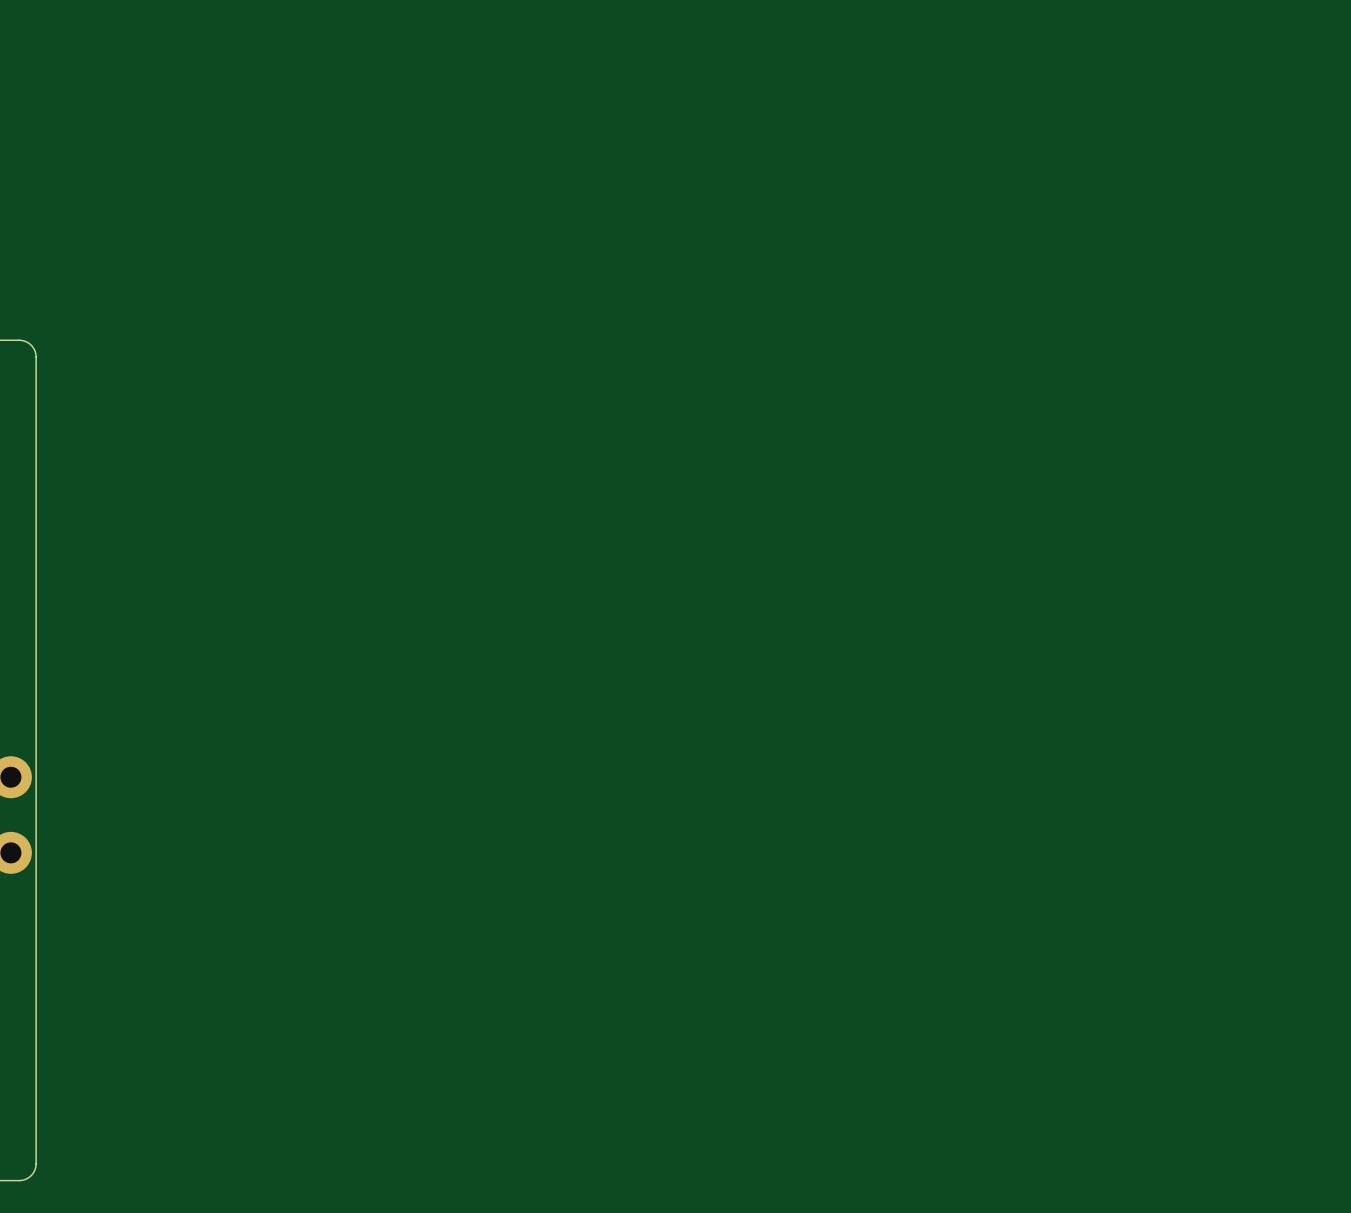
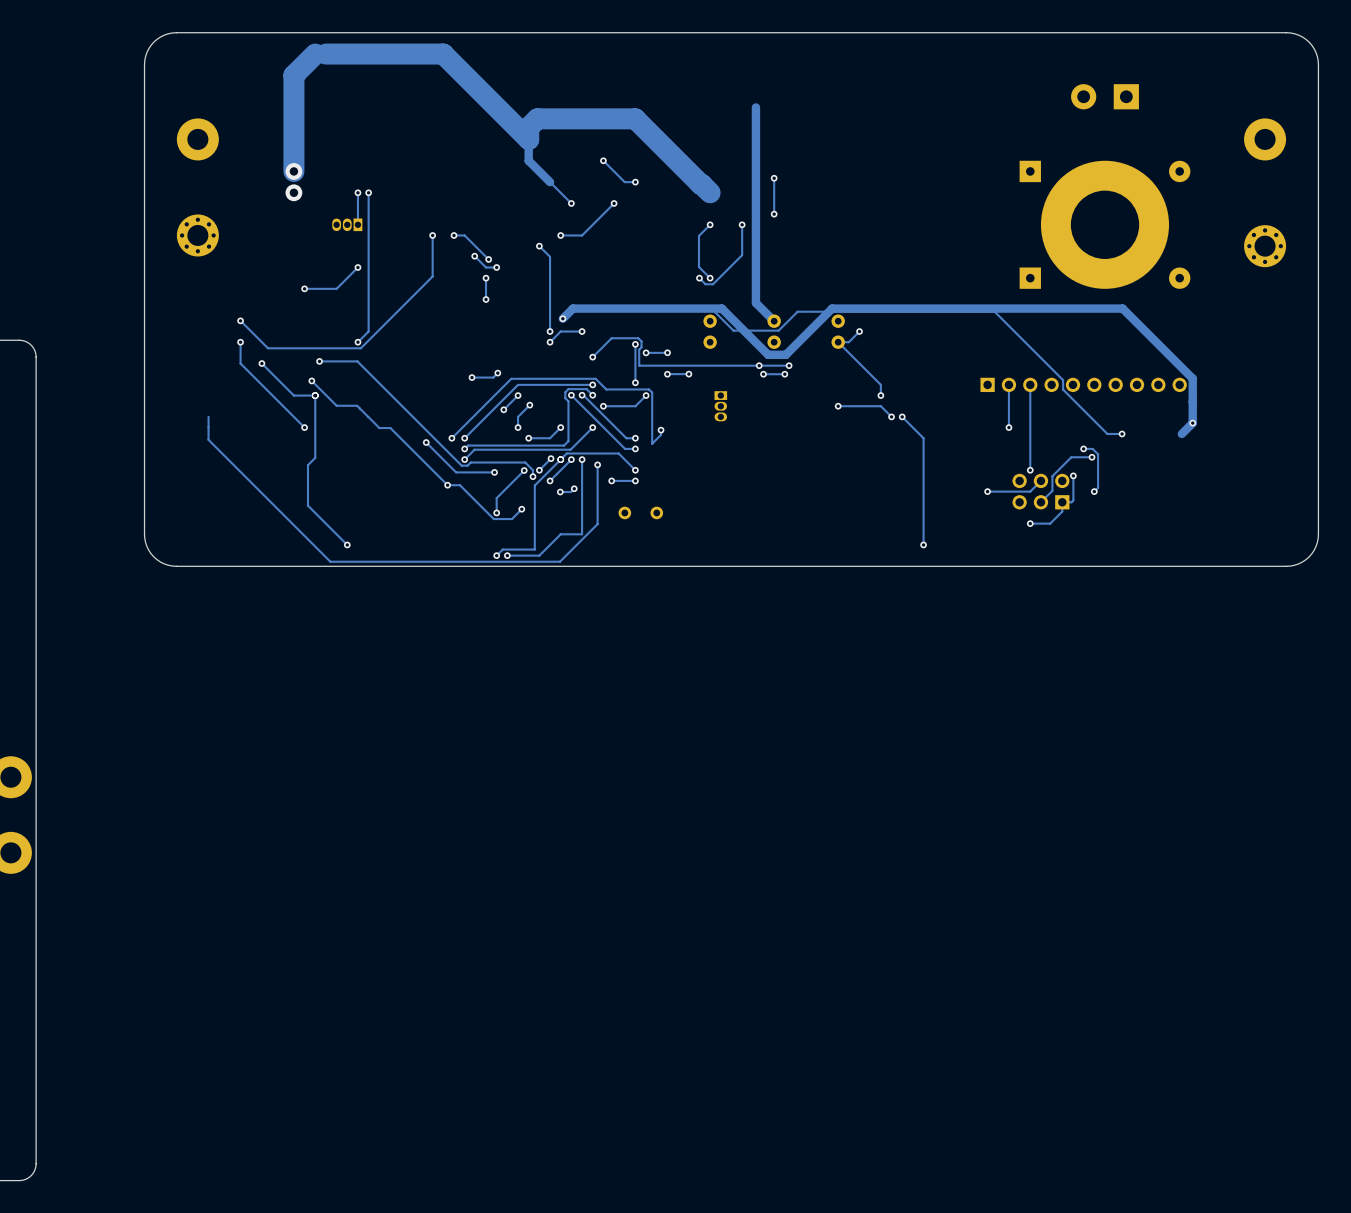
board edge: none -> (1286, 32) (176, 32) (164, 35) (153, 42) (148, 48) (144, 64) (144, 534) (146, 546) (153, 556) (160, 562) (176, 566) (1286, 566) (1298, 563) (1309, 556) (1314, 550) (1318, 534) (1318, 64) (1316, 52) (1309, 42) (1298, 35) (1286, 32)
part: none -> (1105, 96)
track: none -> (755, 107) (755, 302) (774, 321)
part: none -> (197, 139)
track: none -> (528, 139) (528, 160) (571, 203)
track: none -> (528, 139) (443, 54) (315, 54) (293, 75) (293, 171)
track: none -> (528, 139) (528, 127) (537, 118) (635, 118) (710, 192)
part: none -> (1265, 139)
track: none -> (603, 160) (624, 182) (635, 182)
via: none -> (603, 160)
via: none -> (293, 171)
track: none -> (774, 178) (774, 214)
via: none -> (774, 178)
via: none -> (635, 182)
via: none -> (293, 192)
track: none -> (357, 192) (357, 224)
via: none -> (357, 192)
track: none -> (368, 192) (368, 331) (357, 342)
via: none -> (368, 192)
via: none -> (571, 203)
track: none -> (614, 203) (582, 235) (560, 235)
via: none -> (614, 203)
via: none -> (774, 214)
part: none -> (347, 224)
track: none -> (710, 224) (699, 235) (699, 267) (710, 278)
via: none -> (710, 224)
track: none -> (742, 224) (742, 255) (713, 284) (705, 284) (699, 278)
via: none -> (742, 224)
part: none -> (1105, 224)
part: none -> (197, 235)
track: none -> (432, 235) (432, 276) (360, 348) (268, 348) (240, 320)
via: none -> (432, 235)
track: none -> (454, 235) (464, 235) (488, 259)
via: none -> (454, 235)
via: none -> (560, 235)
track: none -> (539, 246) (550, 256) (550, 331)
via: none -> (539, 246)
part: none -> (1265, 246)
track: none -> (474, 256) (486, 267) (496, 267)
via: none -> (474, 256)
via: none -> (488, 259)
track: none -> (357, 267) (336, 288) (304, 288)
via: none -> (357, 267)
via: none -> (496, 267)
track: none -> (486, 278) (486, 299)
via: none -> (486, 278)
via: none -> (699, 278)
via: none -> (710, 278)
via: none -> (304, 288)
via: none -> (486, 299)
track: none -> (714, 311) (733, 330) (778, 330) (797, 311) (994, 311) (1063, 380) (1063, 389) (1107, 433) (1122, 433)
track: none -> (562, 318) (572, 308) (721, 308) (768, 354) (785, 354) (832, 308) (1122, 308) (1192, 378) (1192, 423) (1181, 433)
via: none -> (562, 318)
via: none -> (240, 320)
via: none -> (550, 331)
track: none -> (582, 331) (560, 331) (550, 342)
via: none -> (582, 331)
part: none -> (710, 331)
part: none -> (774, 331)
part: none -> (838, 331)
track: none -> (859, 331) (848, 342) (838, 342) (880, 384) (880, 395)
via: none -> (859, 331)
track: none -> (240, 342) (240, 363) (304, 427)
via: none -> (240, 342)
via: none -> (357, 342)
via: none -> (550, 342)
track: none -> (635, 344) (635, 382)
via: none -> (635, 344)
via: none -> (646, 352)
track: none -> (667, 352) (646, 352)
via: none -> (667, 352)
track: none -> (592, 357) (611, 338) (638, 338) (641, 341) (641, 347) (639, 349) (639, 365) (789, 365)
via: none -> (592, 357)
track: none -> (319, 361) (357, 361) (461, 465) (467, 465) (470, 462) (525, 462) (532, 470) (532, 476)
via: none -> (319, 361)
track: none -> (261, 363) (293, 395) (315, 395) (315, 457) (308, 465) (308, 505) (347, 544)
via: none -> (261, 363)
via: none -> (759, 365)
via: none -> (789, 365)
track: none -> (497, 373) (493, 377) (472, 377)
via: none -> (497, 373)
via: none -> (667, 374)
track: none -> (688, 374) (667, 374)
via: none -> (688, 374)
via: none -> (763, 374)
track: none -> (784, 374) (763, 374)
via: none -> (784, 374)
via: none -> (472, 377)
track: none -> (311, 380) (336, 405) (357, 405) (379, 428) (390, 428) (447, 485) (459, 485) (493, 519) (511, 519) (521, 509)
via: none -> (311, 380)
via: none -> (635, 382)
track: none -> (592, 384) (518, 384) (464, 438)
via: none -> (592, 384)
track: none -> (1008, 384) (1008, 427)
track: none -> (1030, 384) (1030, 470)
part: none -> (1083, 384)
via: none -> (315, 395)
track: none -> (518, 395) (503, 409)
via: none -> (518, 395)
track: none -> (571, 395) (625, 448) (635, 448)
via: none -> (571, 395)
track: none -> (582, 395) (626, 438) (635, 438)
via: none -> (582, 395)
track: none -> (592, 395) (586, 389) (568, 389) (565, 392) (565, 398) (568, 401) (568, 441) (564, 445) (468, 445) (464, 448)
via: none -> (592, 395)
track: none -> (646, 395) (635, 406) (603, 406)
via: none -> (646, 395)
via: none -> (880, 395)
track: none -> (529, 405) (518, 416) (518, 427)
via: none -> (529, 405)
via: none -> (603, 406)
part: none -> (720, 406)
track: none -> (838, 406) (880, 406) (891, 416)
via: none -> (838, 406)
via: none -> (503, 409)
track: none -> (208, 416) (208, 439) (330, 561) (559, 561) (597, 524) (597, 464)
via: none -> (891, 416)
track: none -> (902, 416) (923, 438) (923, 544)
via: none -> (902, 416)
via: none -> (1192, 423)
via: none -> (304, 427)
via: none -> (518, 427)
track: none -> (560, 427) (550, 438) (528, 438)
via: none -> (560, 427)
track: none -> (592, 427) (570, 449) (474, 449) (464, 459)
via: none -> (592, 427)
via: none -> (1008, 427)
track: none -> (661, 430) (661, 434) (652, 443) (652, 392) (649, 389) (606, 389) (595, 378) (511, 378) (451, 438)
via: none -> (661, 430)
via: none -> (1122, 433)
via: none -> (451, 438)
via: none -> (464, 438)
via: none -> (528, 438)
via: none -> (635, 438)
track: none -> (426, 442) (456, 472) (494, 472)
via: none -> (426, 442)
via: none -> (464, 448)
via: none -> (635, 448)
track: none -> (1083, 448) (1092, 448) (1098, 454) (1098, 487) (1094, 491)
via: none -> (1083, 448)
track: none -> (1091, 457) (1071, 457) (1052, 476) (1052, 490) (1040, 502)
via: none -> (1091, 457)
track: none -> (551, 458) (539, 470)
via: none -> (551, 458)
via: none -> (464, 459)
via: none -> (560, 459)
track: none -> (571, 459) (550, 480)
via: none -> (571, 459)
track: none -> (582, 459) (582, 534) (560, 534) (539, 555) (507, 555)
via: none -> (582, 459)
via: none -> (597, 464)
track: none -> (524, 470) (496, 498) (496, 512)
via: none -> (524, 470)
via: none -> (539, 470)
track: none -> (635, 470) (618, 453) (566, 453) (534, 485) (534, 549) (502, 549) (496, 555)
via: none -> (635, 470)
via: none -> (1030, 470)
via: none -> (494, 472)
track: none -> (1073, 475) (1073, 500) (1071, 502) (1062, 502) (1062, 511) (1050, 523) (1030, 523)
via: none -> (1073, 475)
via: none -> (532, 476)
via: none -> (550, 480)
via: none -> (611, 480)
track: none -> (635, 480) (611, 480)
via: none -> (635, 480)
track: none -> (1040, 480) (1030, 491) (987, 491)
via: none -> (447, 485)
track: none -> (574, 488) (570, 492) (560, 492)
via: none -> (574, 488)
via: none -> (987, 491)
part: none -> (1040, 491)
via: none -> (1094, 491)
via: none -> (560, 492)
via: none -> (521, 509)
via: none -> (496, 512)
part: none -> (640, 512)
via: none -> (1030, 523)
via: none -> (347, 544)
via: none -> (923, 544)
via: none -> (496, 555)
via: none -> (507, 555)

